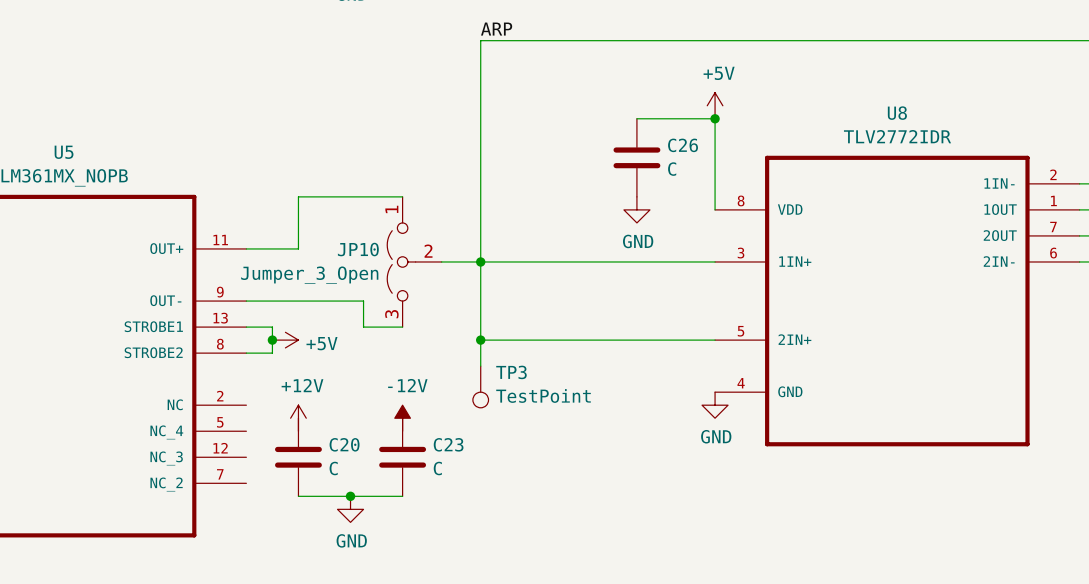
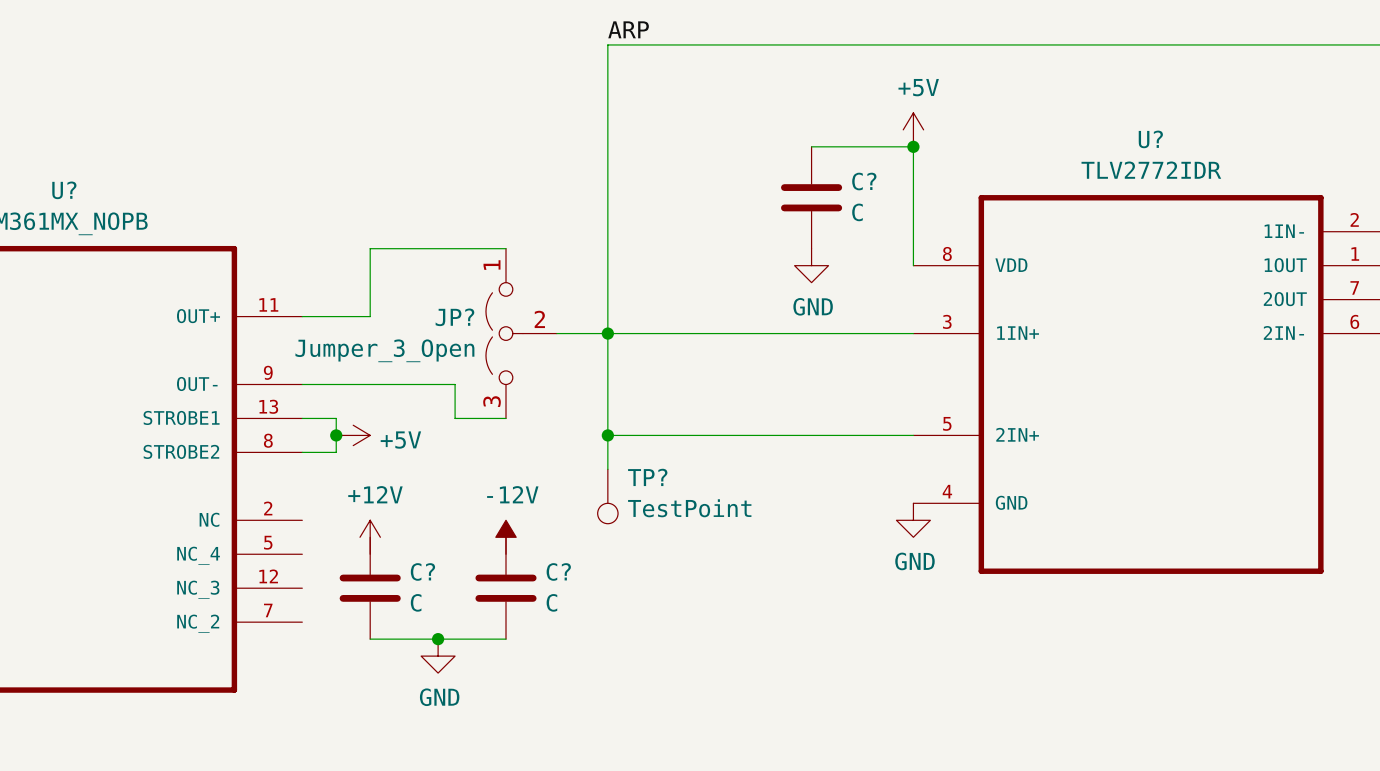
U8 name: U8 (897, 113) -> U? (1150, 139)
C26 name: C26 (683, 145) -> C? (864, 181)
U5 name: U5 (64, 152) -> U? (64, 190)
JP10 name: JP10 (358, 249) -> JP? (454, 317)
TP3 name: TP3 (511, 372) -> TP? (647, 477)
C20 name: C20 (344, 444) -> C? (422, 571)
C23 name: C23 (448, 444) -> C? (558, 571)

